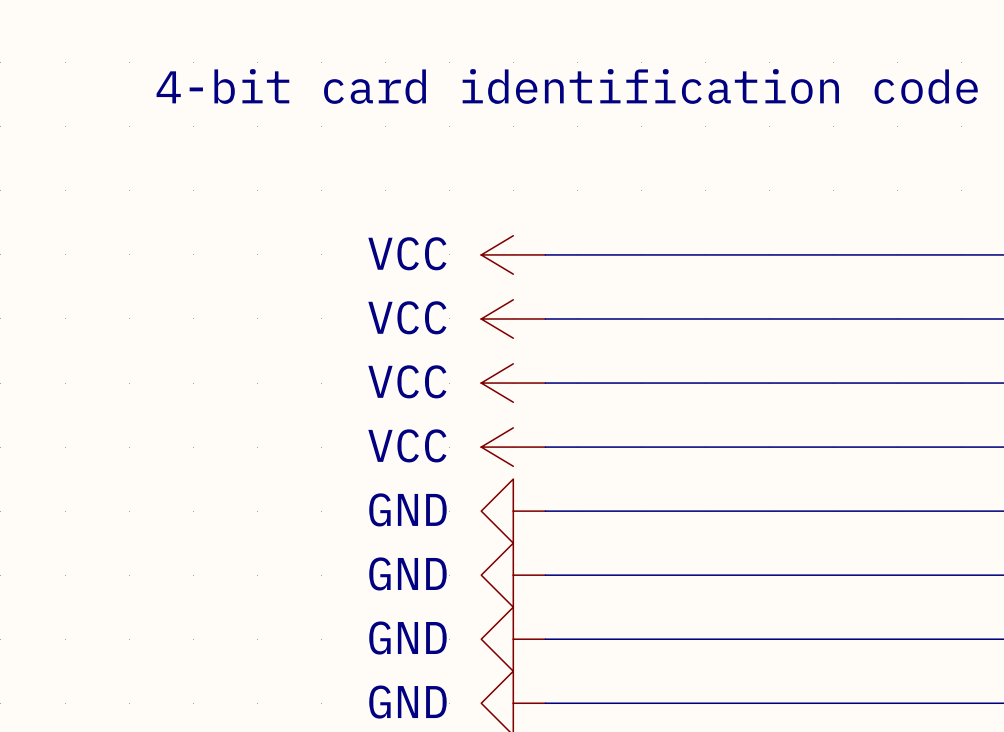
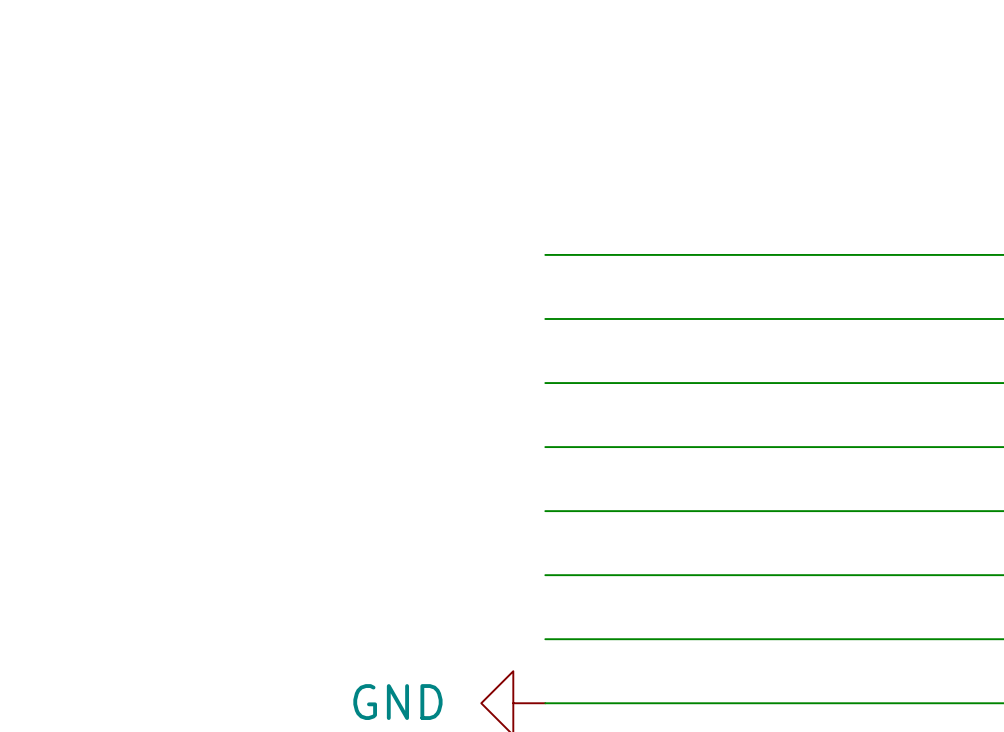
text: 4-bit card identification code (567, 86) -> none
power symbol: VCC (513, 254) -> none
power symbol: VCC (513, 318) -> none
power symbol: VCC (513, 383) -> none
power symbol: VCC (513, 447) -> none
power symbol: GND (513, 511) -> none
power symbol: GND (513, 575) -> none
power symbol: GND (513, 639) -> none

